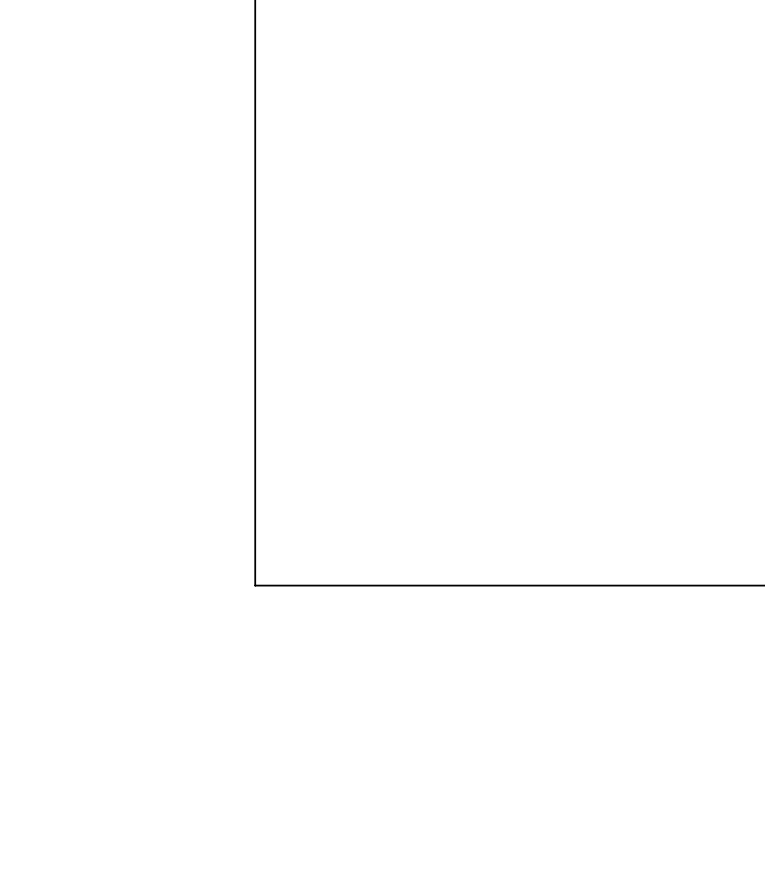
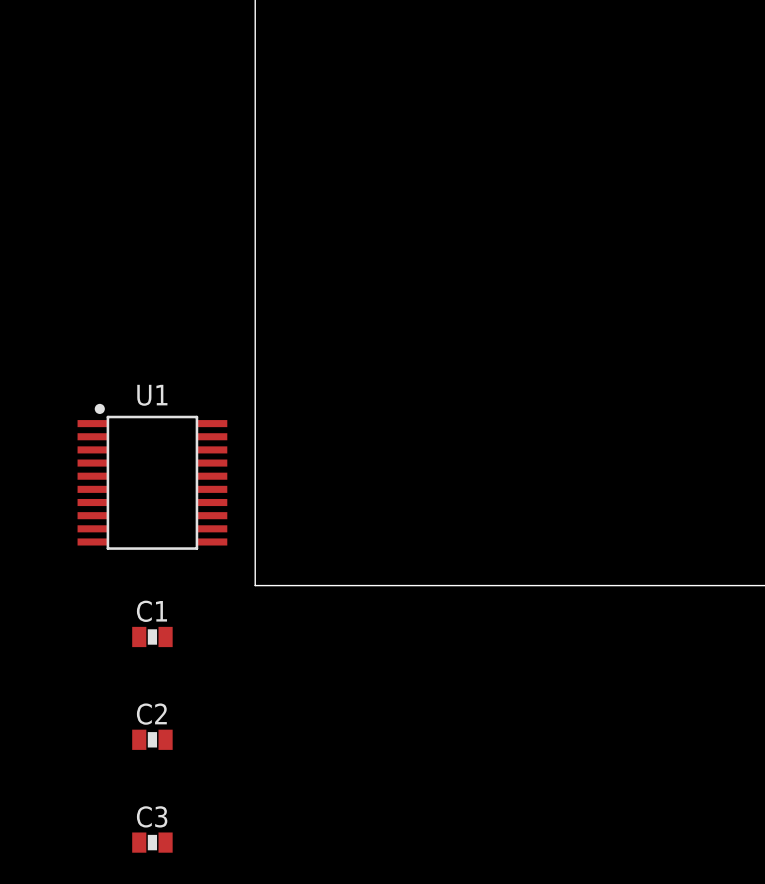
U1: none -> (152, 476)
C1: none -> (152, 636)
C2: none -> (152, 739)
C3: none -> (152, 842)

